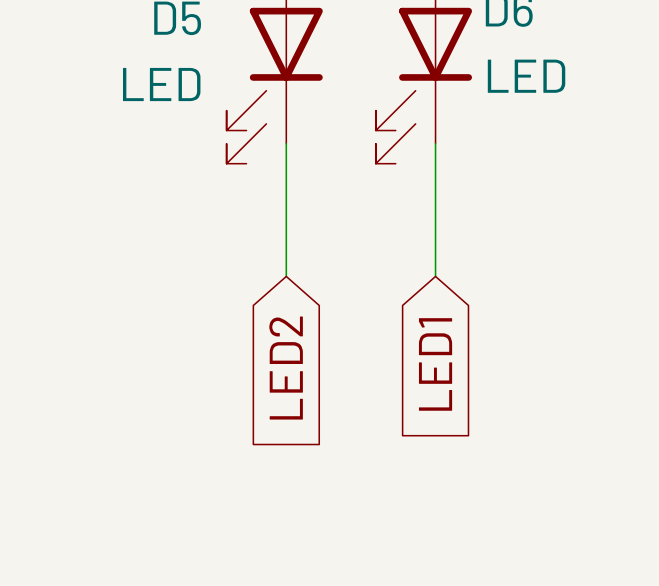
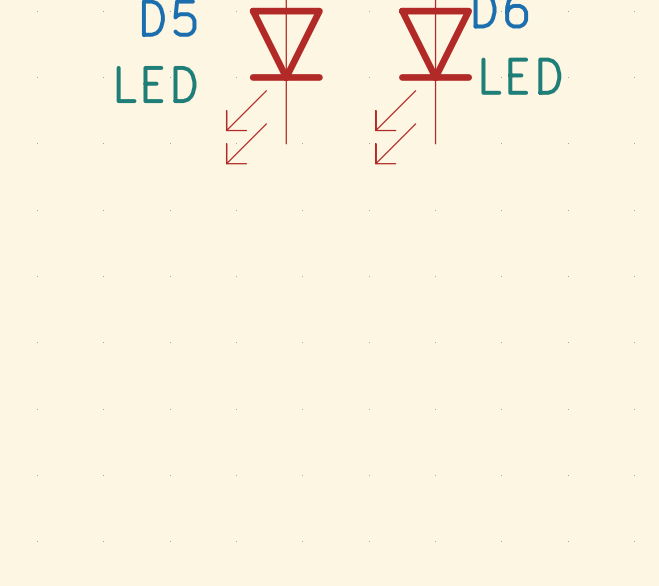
wire: (286, 143) (286, 276) -> none
wire: (435, 143) (435, 276) -> none
global label: LED1 (435, 364) -> none
global label: LED2 (286, 368) -> none

